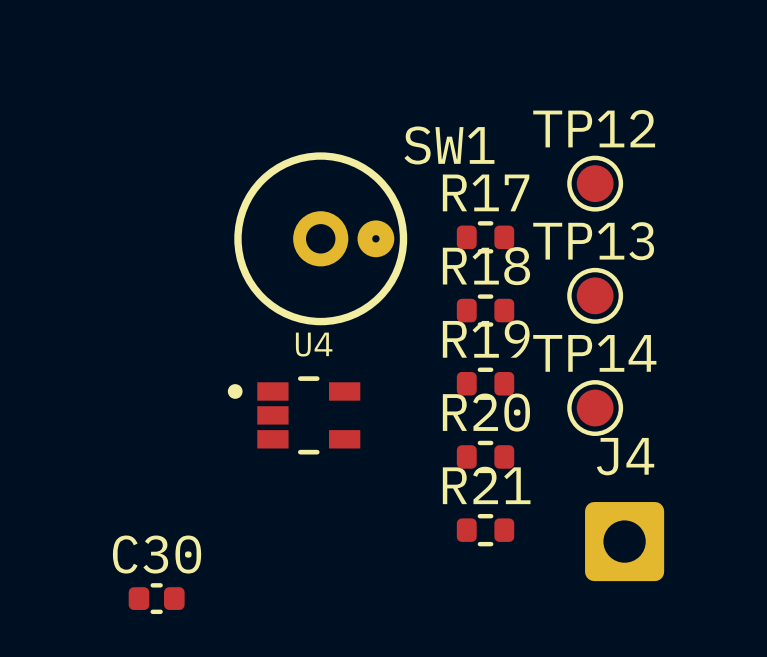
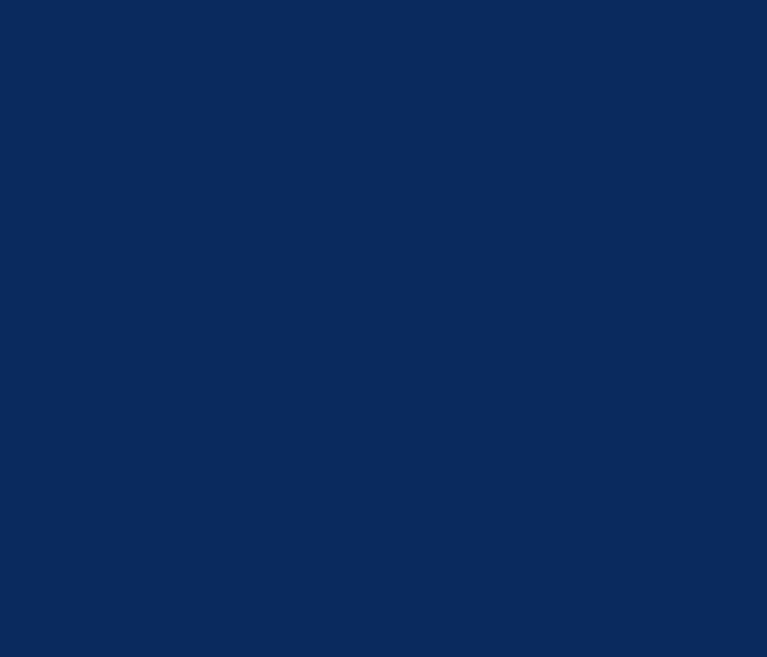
TP12: (595, 183) -> none
R17: (485, 237) -> none
SW1: (320, 238) -> none
TP13: (595, 295) -> none
R18: (485, 310) -> none
R19: (485, 383) -> none
TP14: (595, 408) -> none
U4: (294, 415) -> none
R20: (485, 456) -> none
R21: (485, 530) -> none
J4: (624, 541) -> none
C30: (156, 598) -> none

